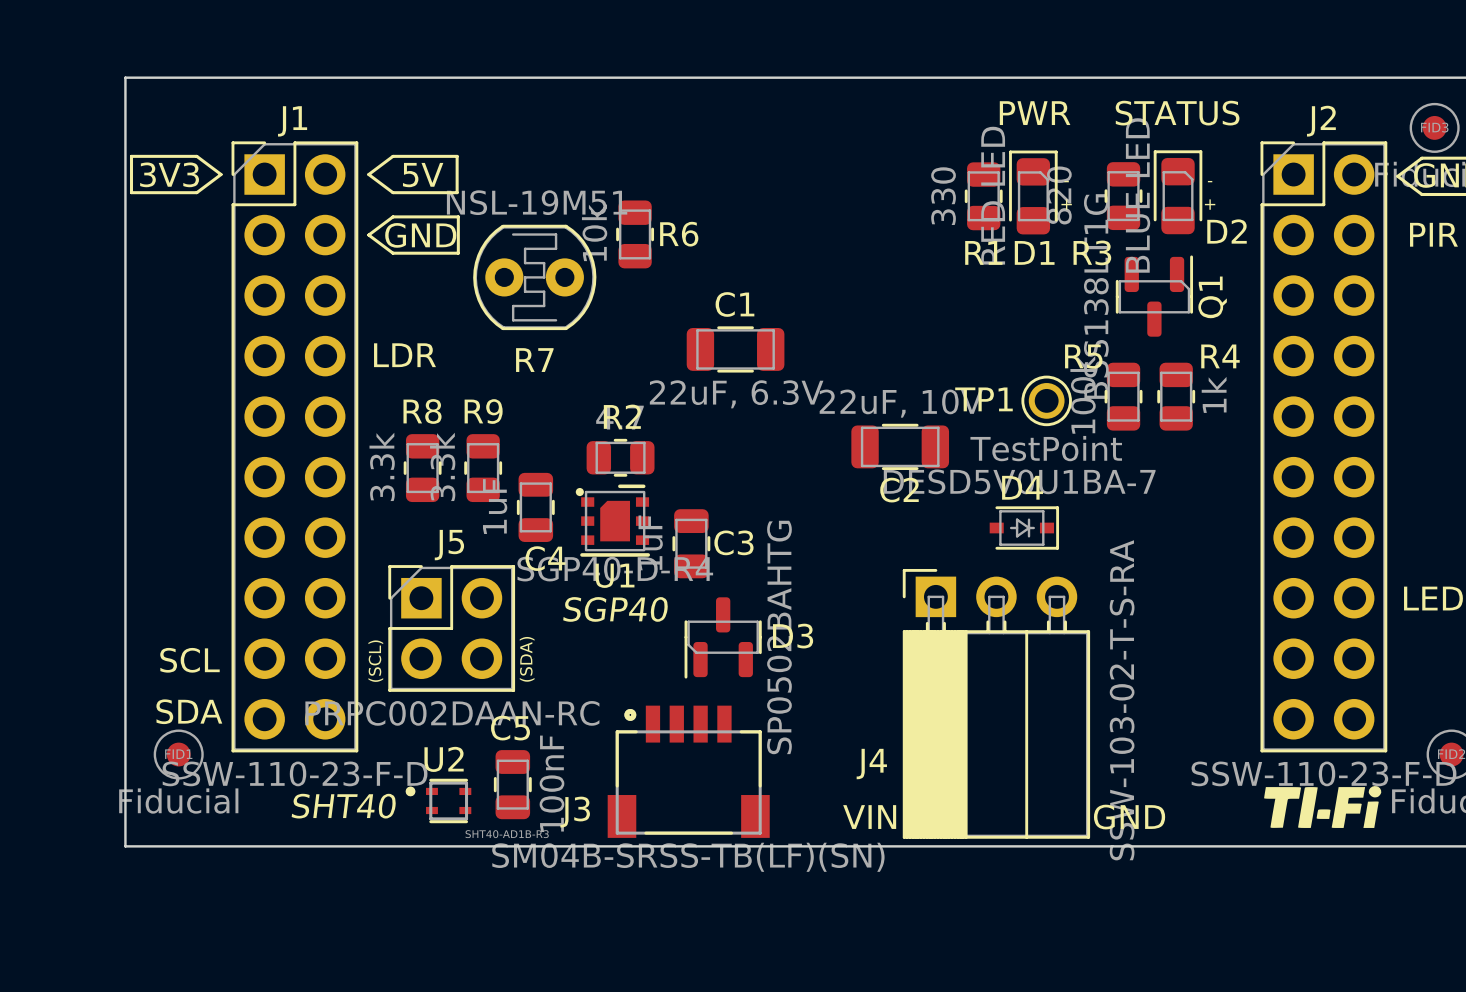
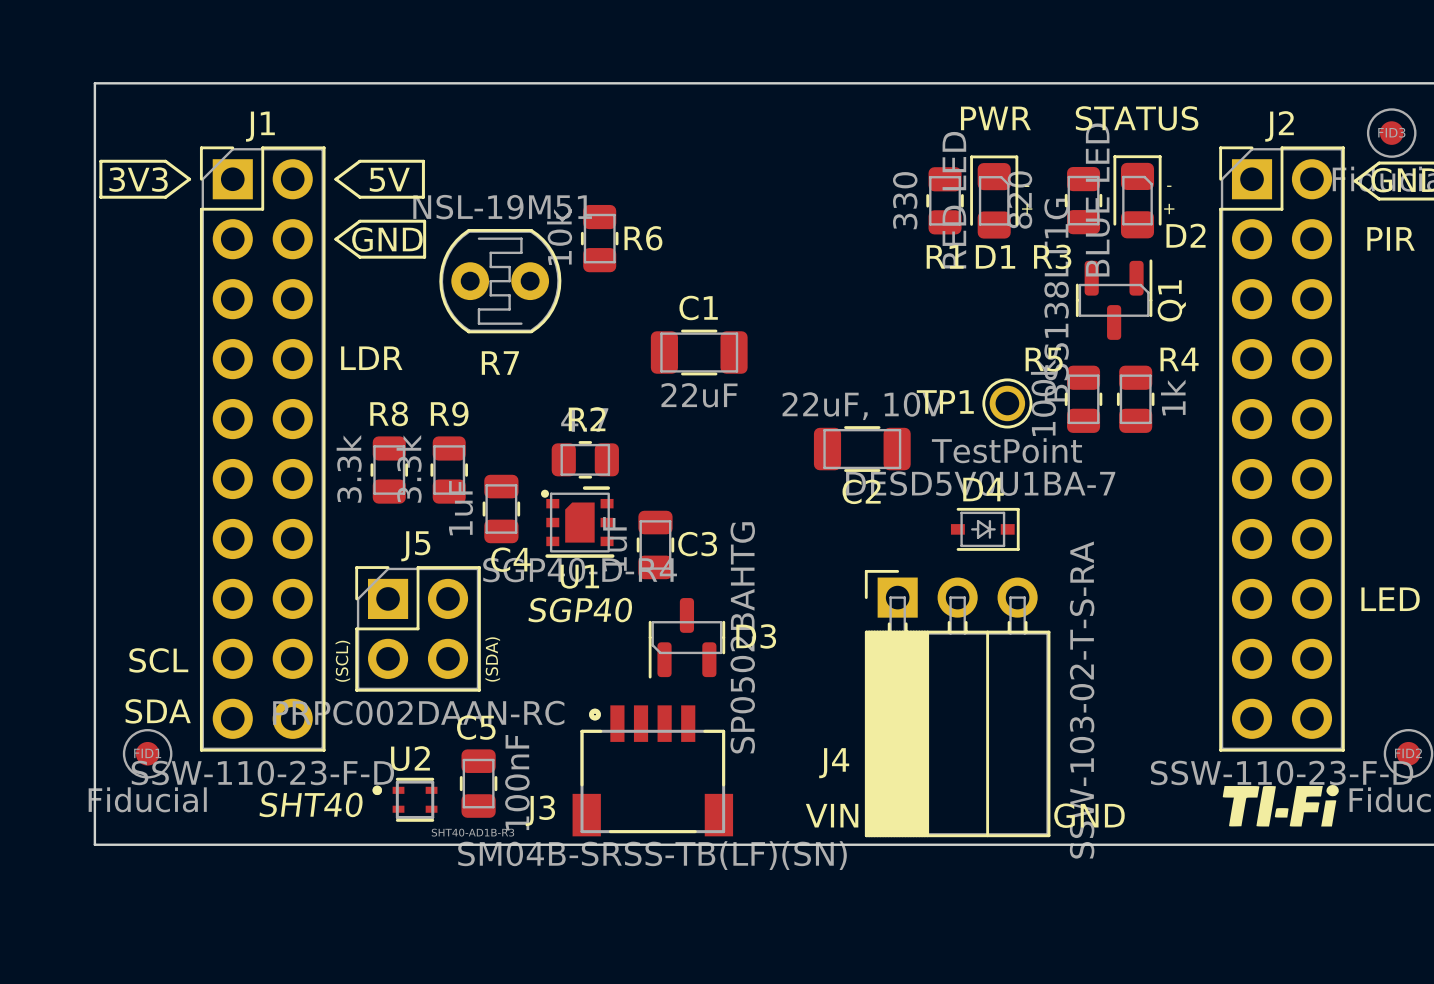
C1 value: 22uF, 6.3V (736, 394) -> 22uF (699, 395)

